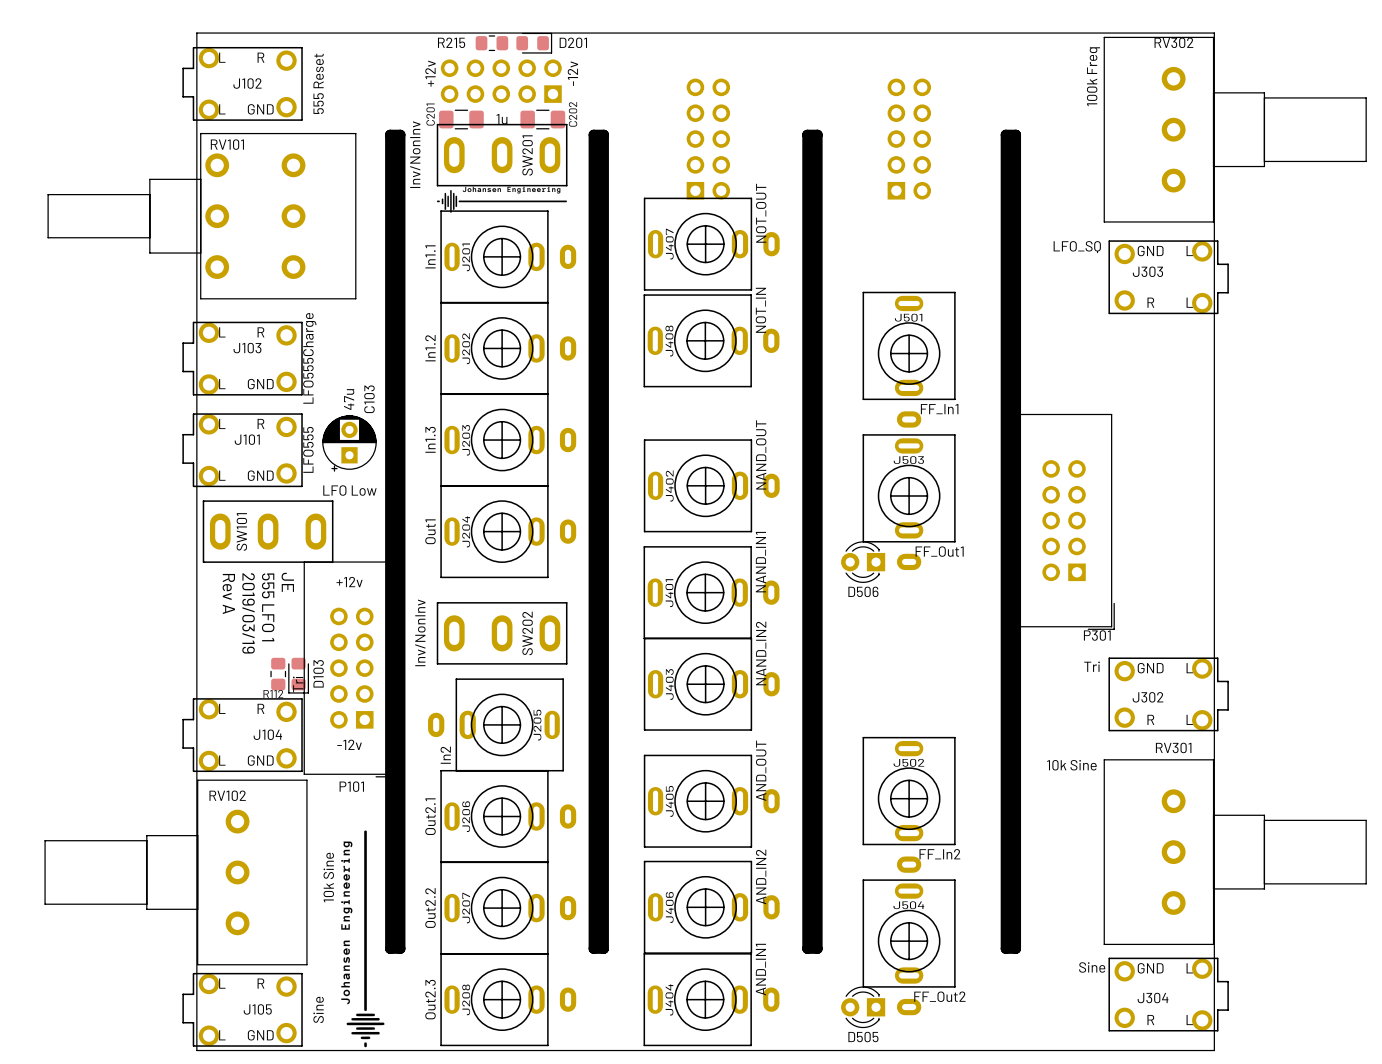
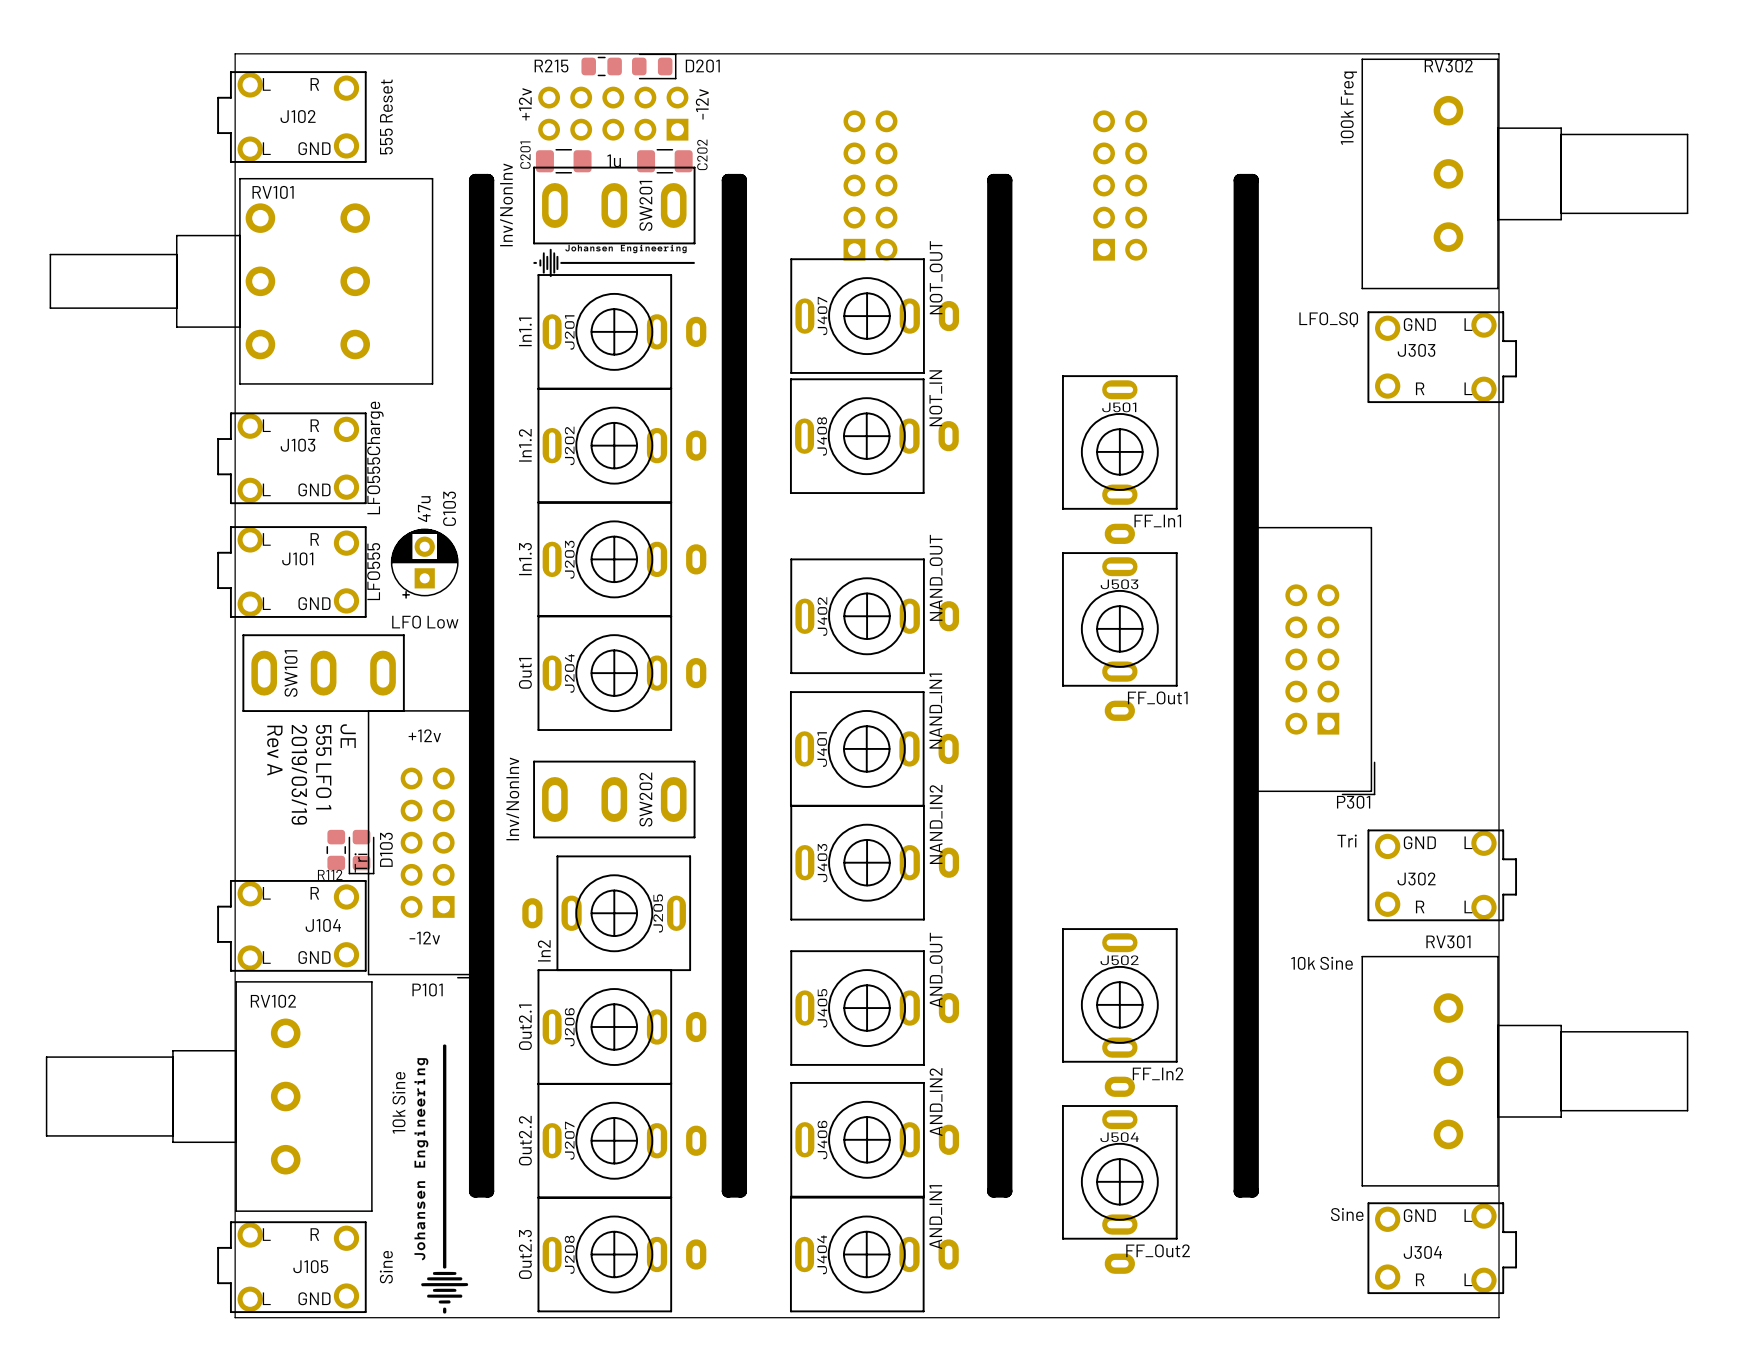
D506: (863, 562) -> none
D505: (863, 1007) -> none

